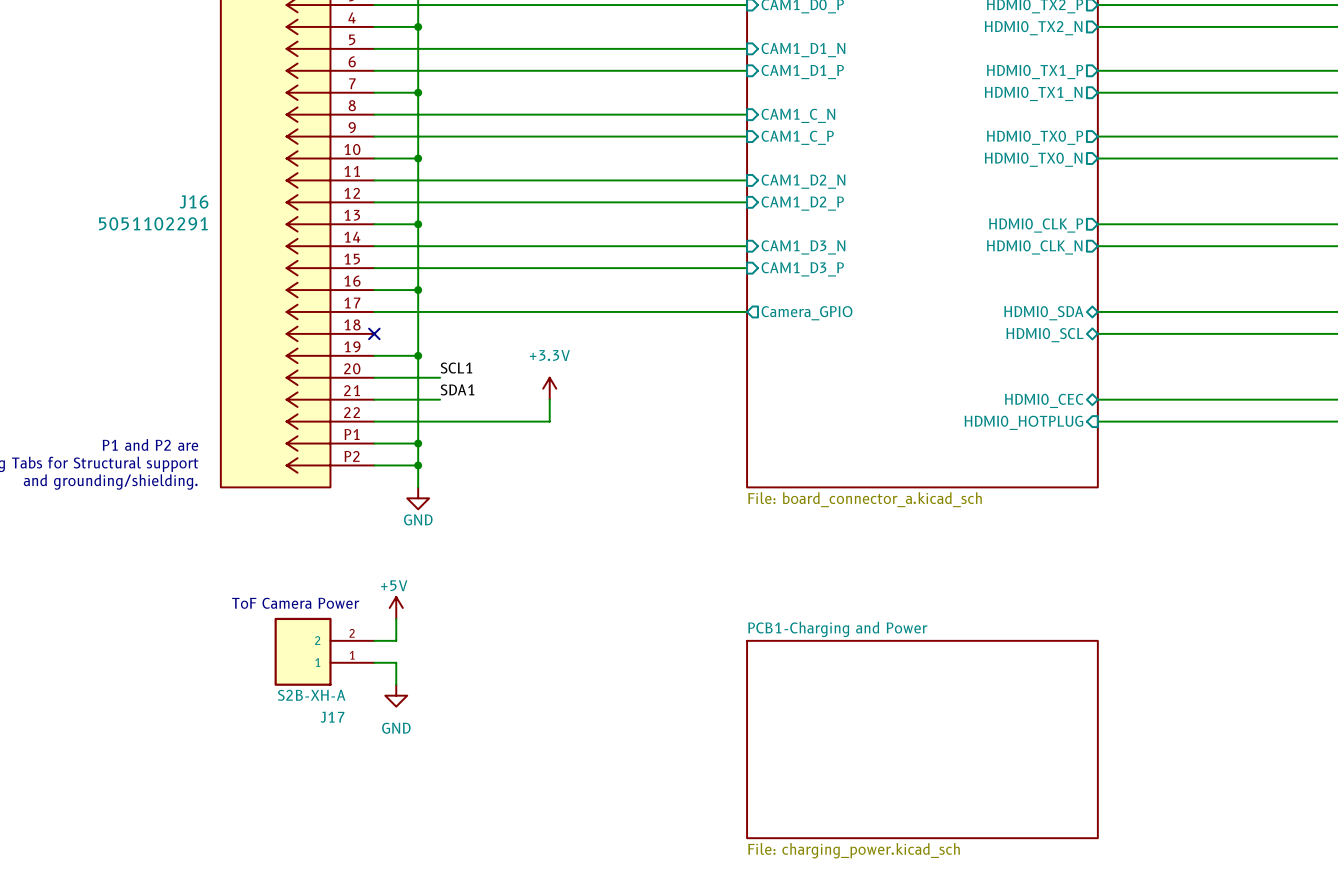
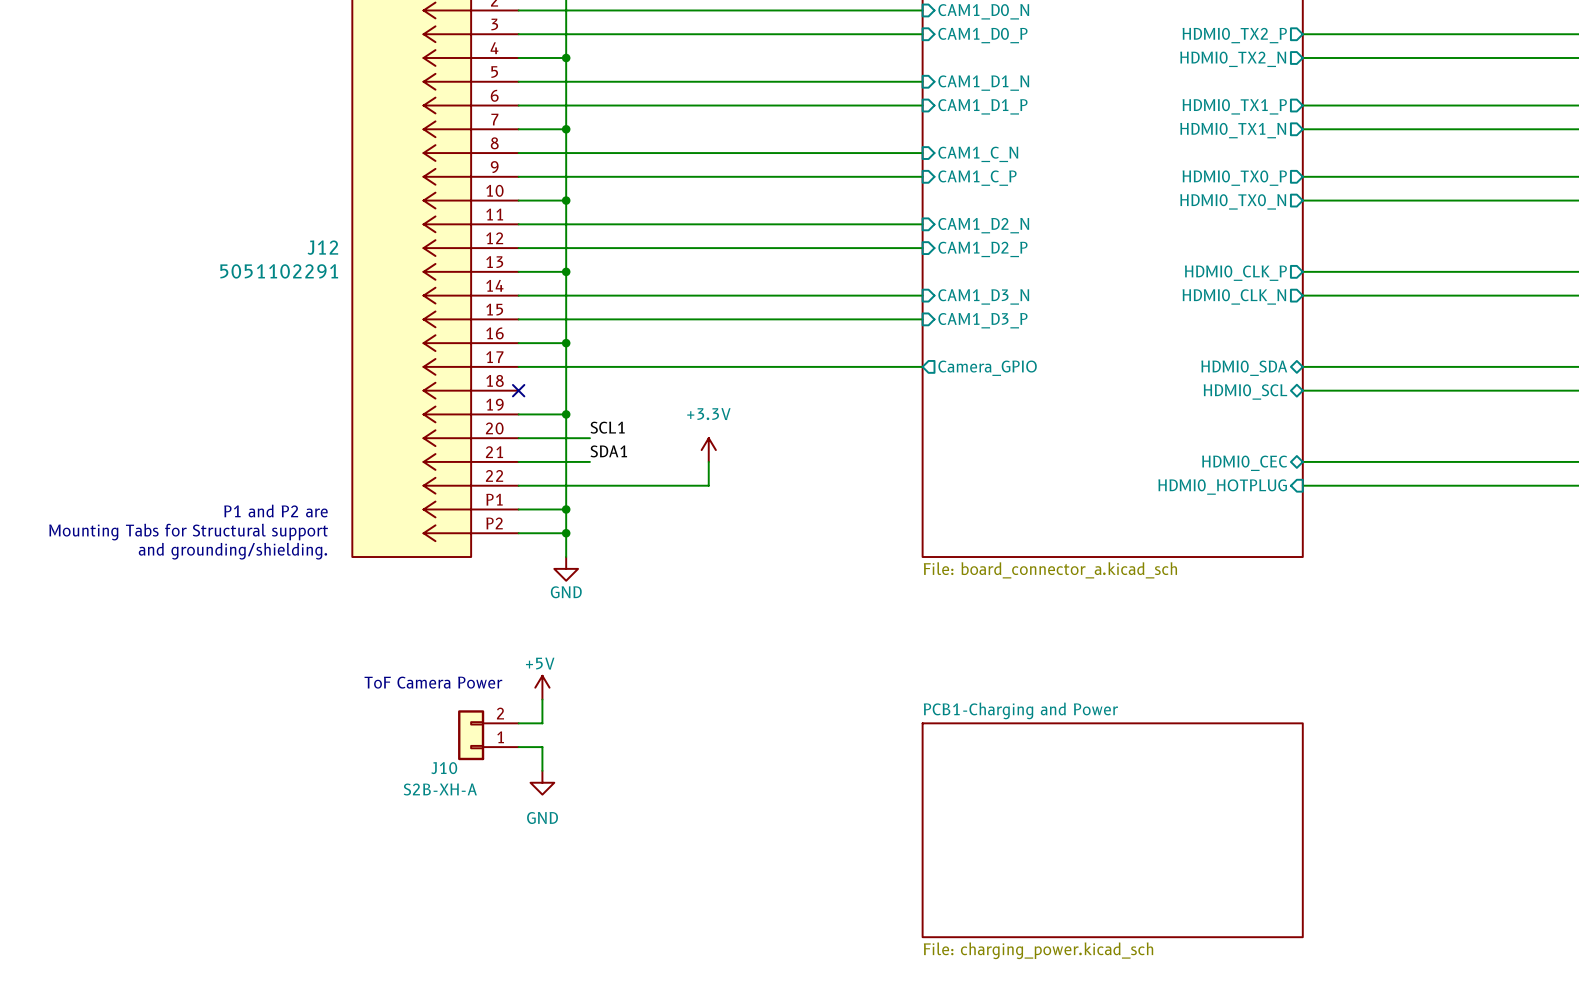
J16 name: J16 (193, 201) -> J12 (322, 247)
J17: S2B-XH-A (324, 651) -> none
J10: none -> S2B-XH-A (488, 735)

